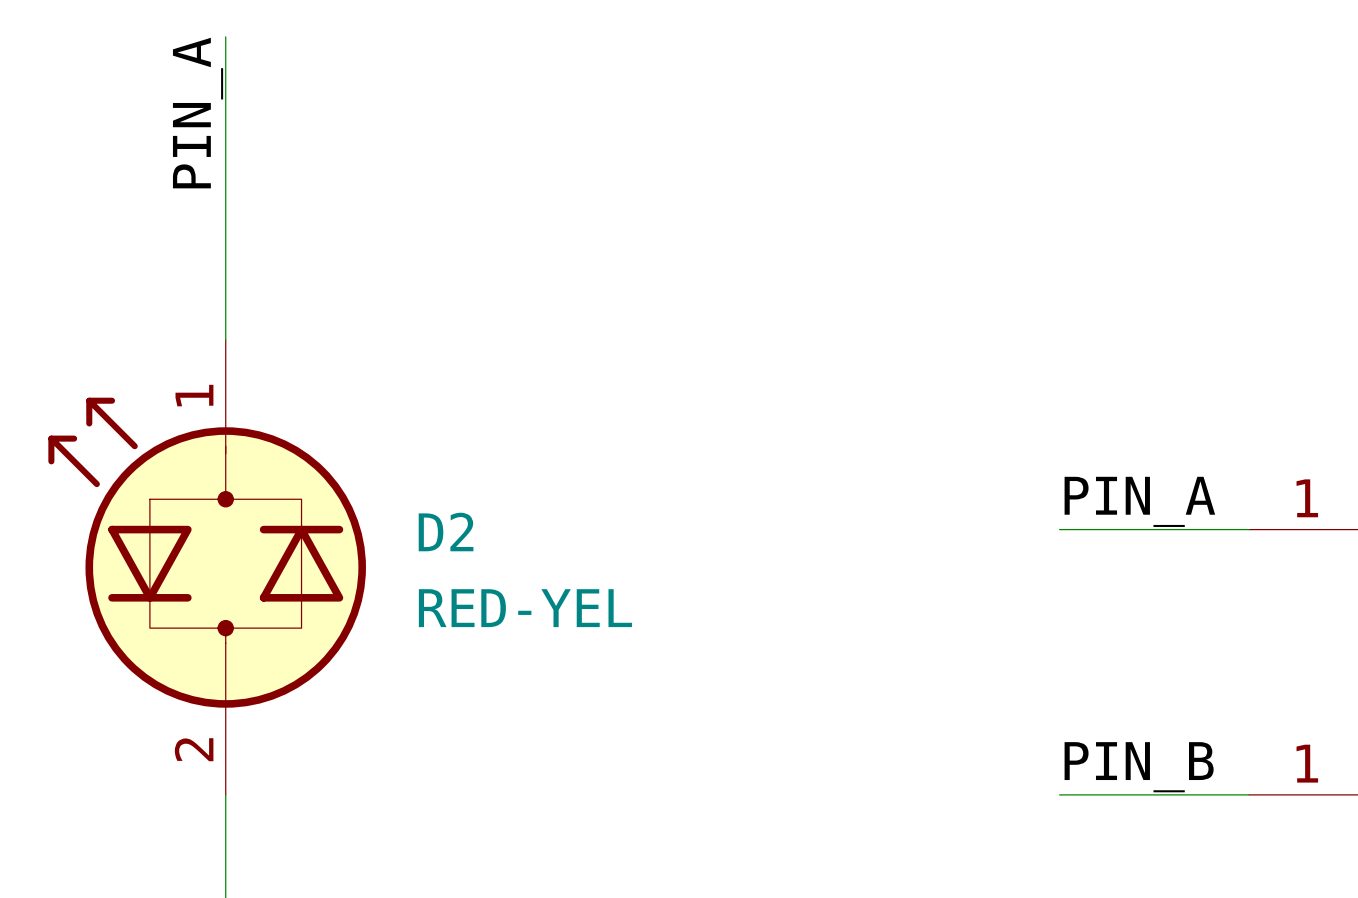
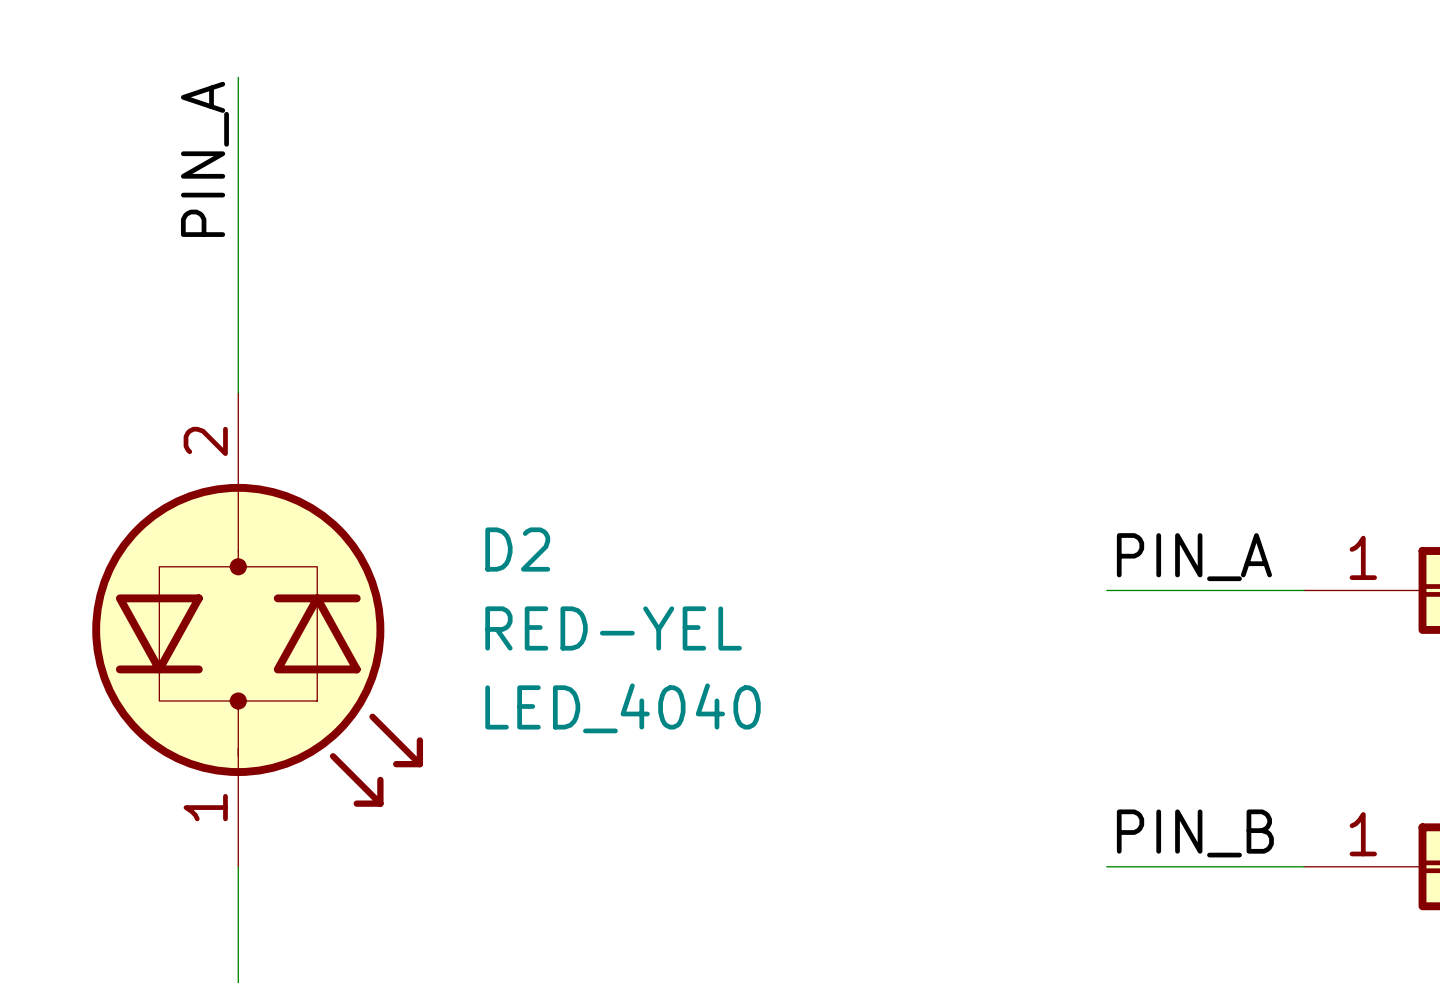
D2 rotation: 0° (207, 552) -> 180° (257, 645)
D2 text: none -> LED_4040 (622, 708)

